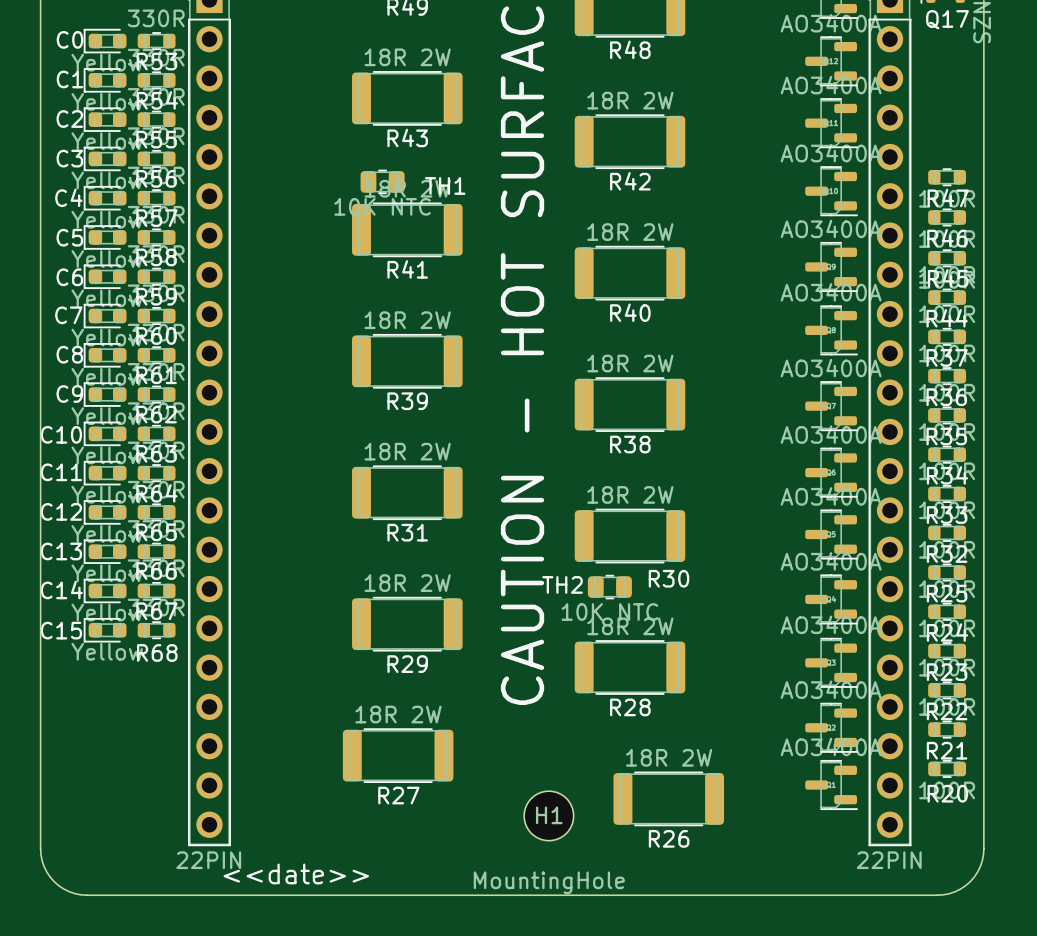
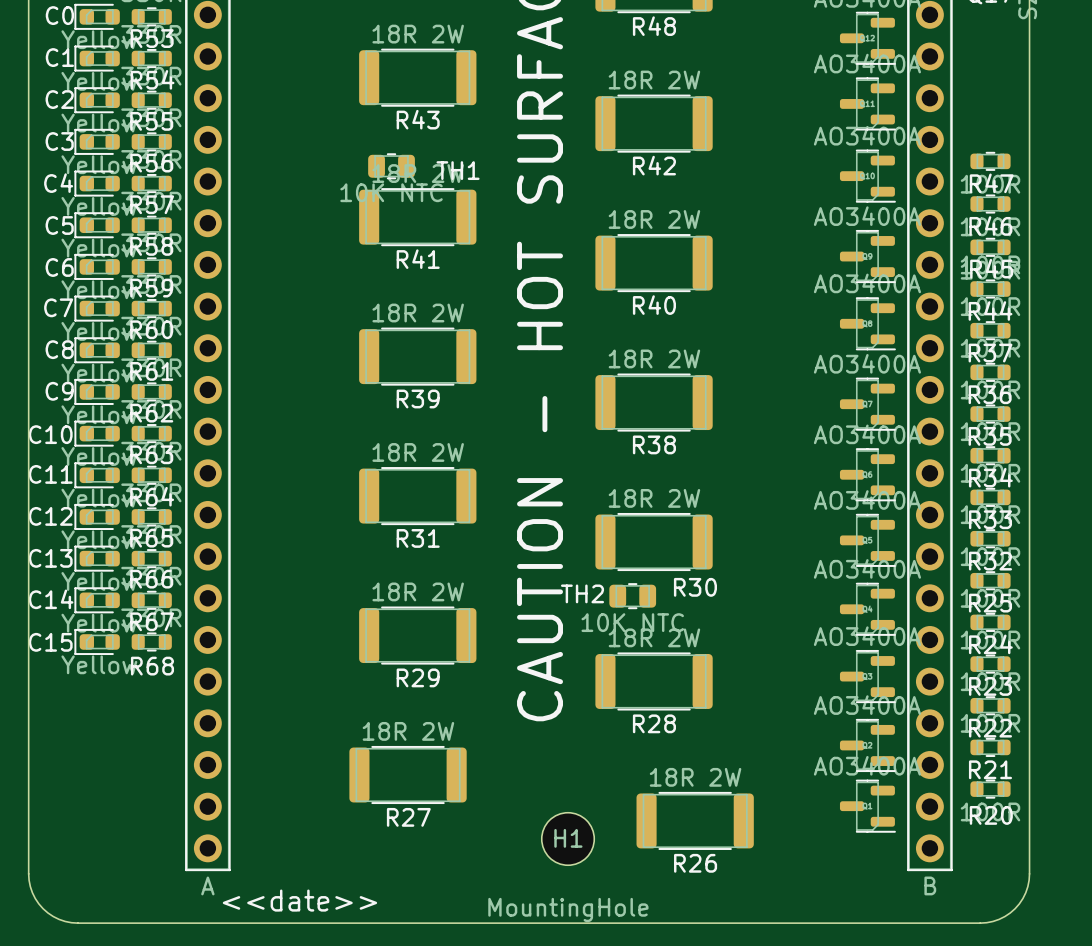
part value: 22PIN (208, 860) -> A (207, 885)
part value: 22PIN (889, 860) -> B (930, 885)

